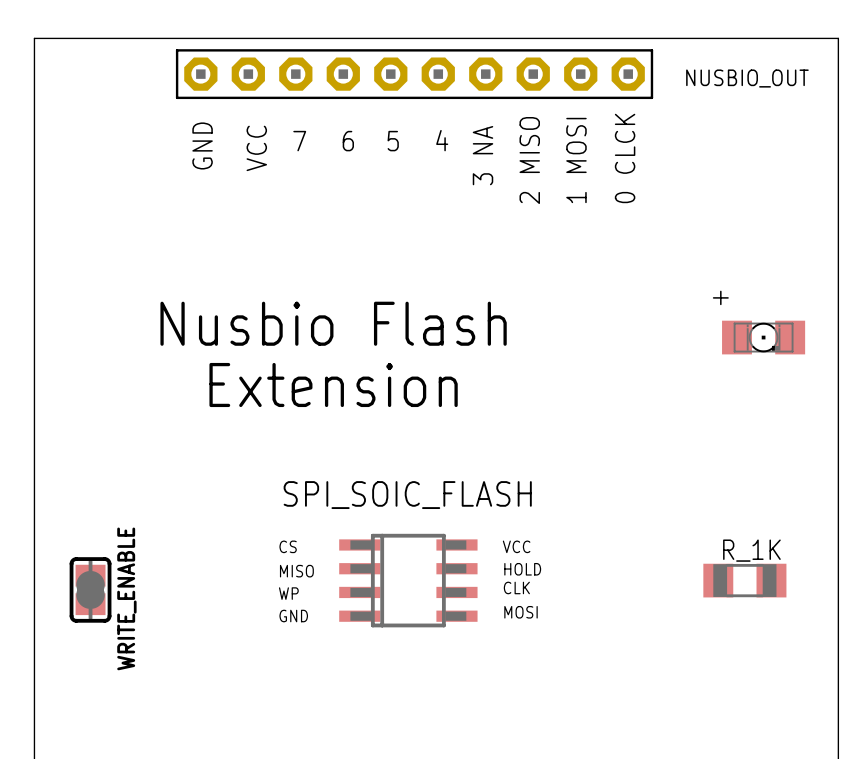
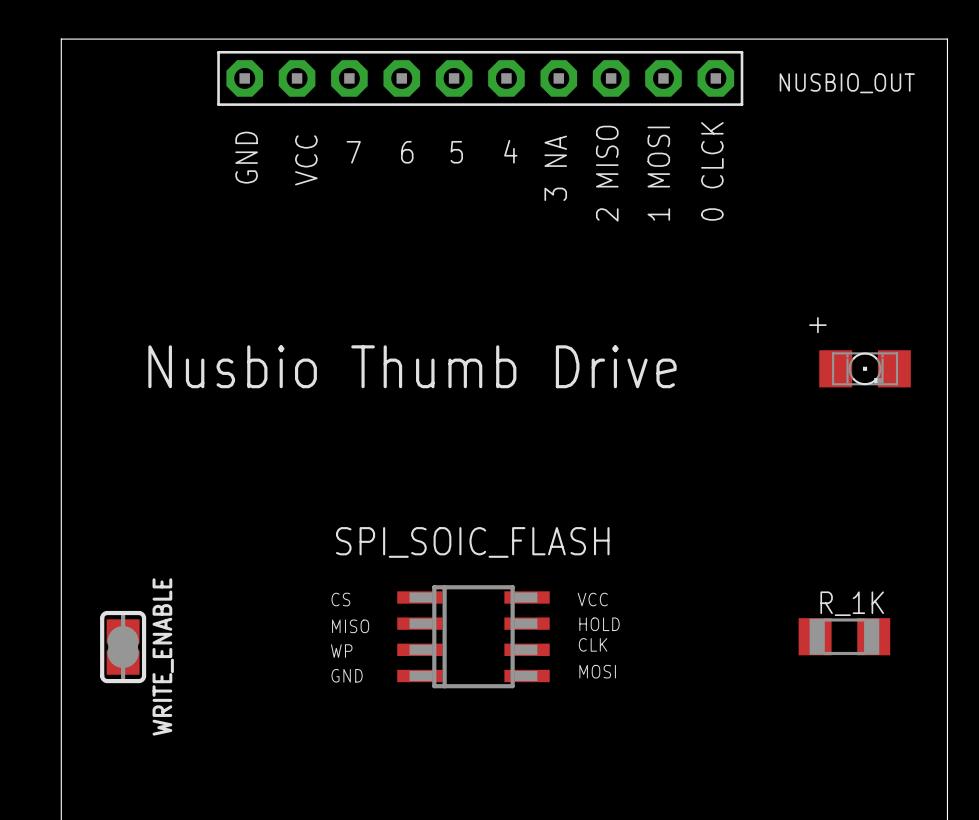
text: Nusbio Flash (333, 323) -> none
text: none -> Nusbio Thumb Drive (412, 366)
text: Extension (333, 385) -> none

